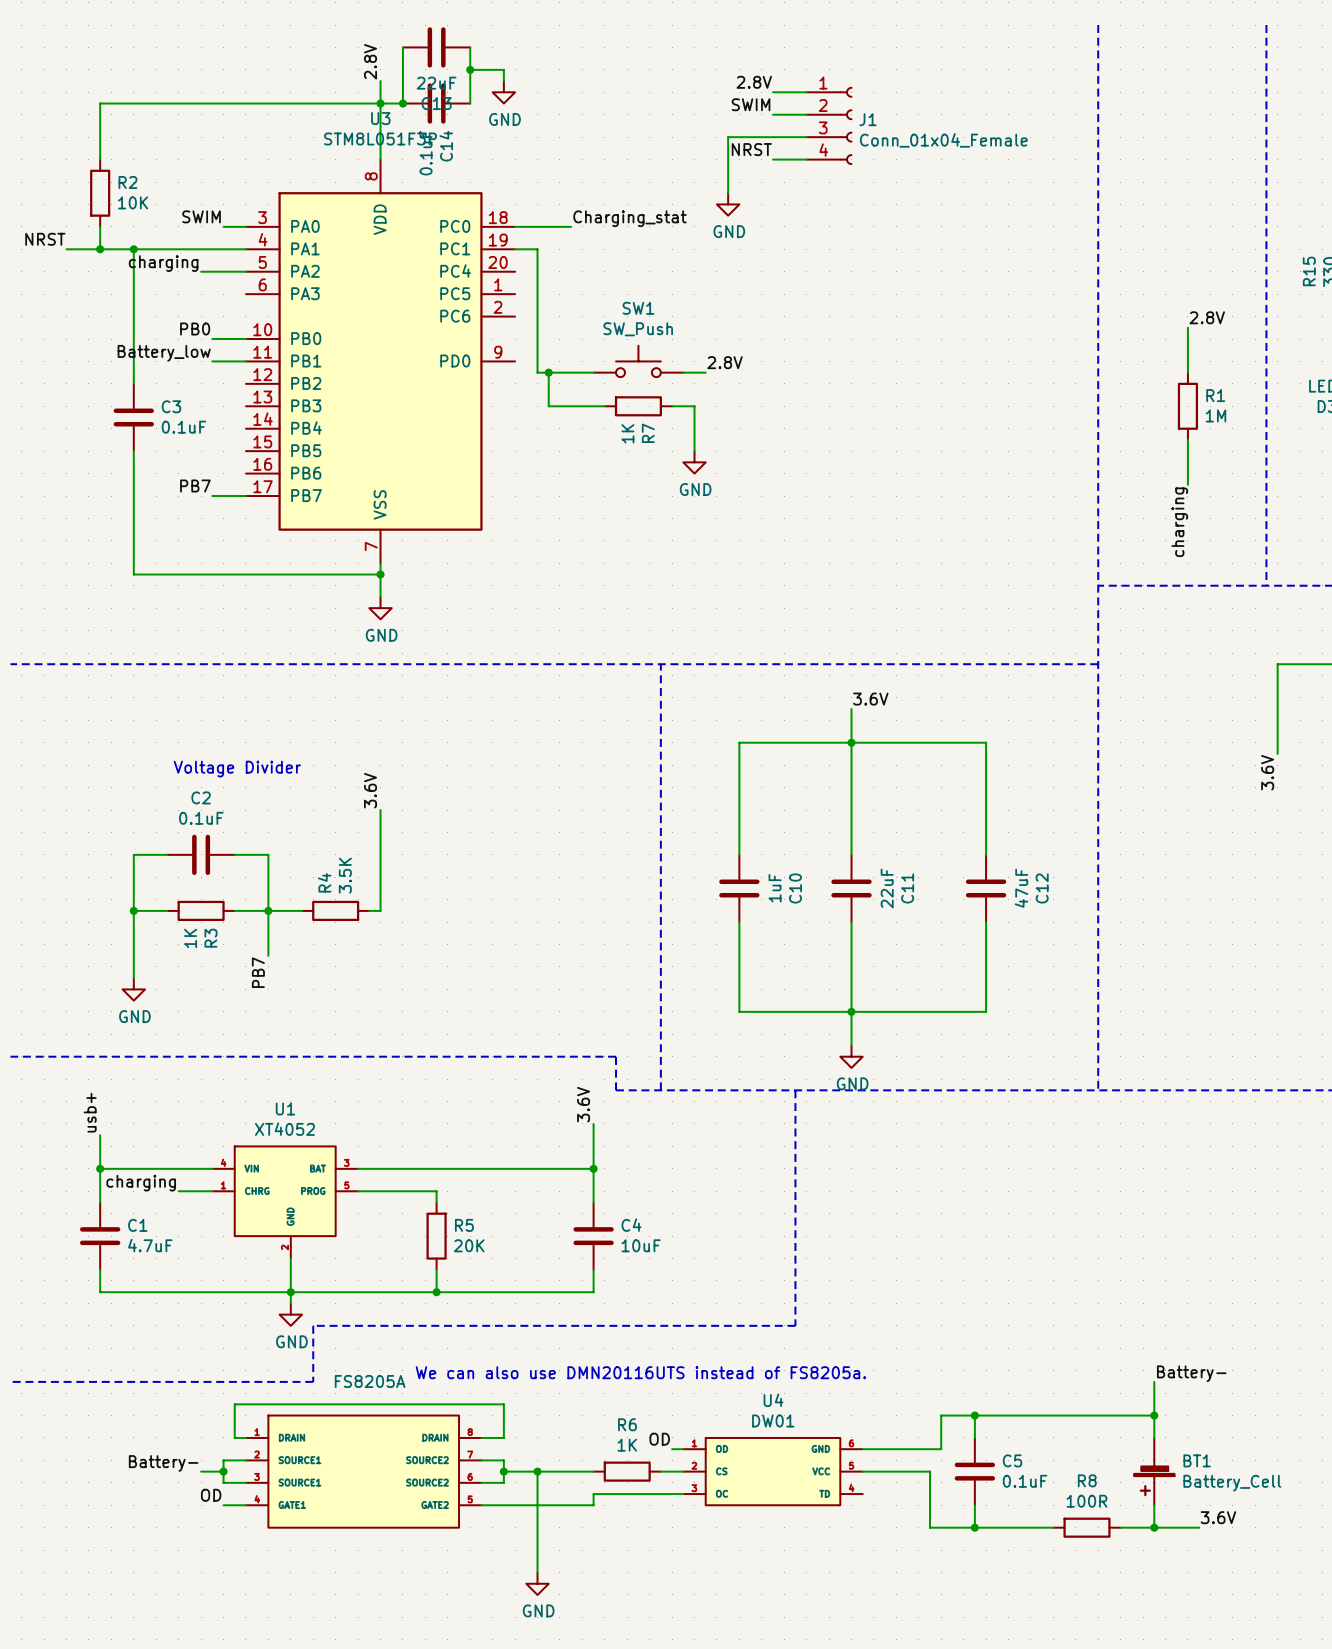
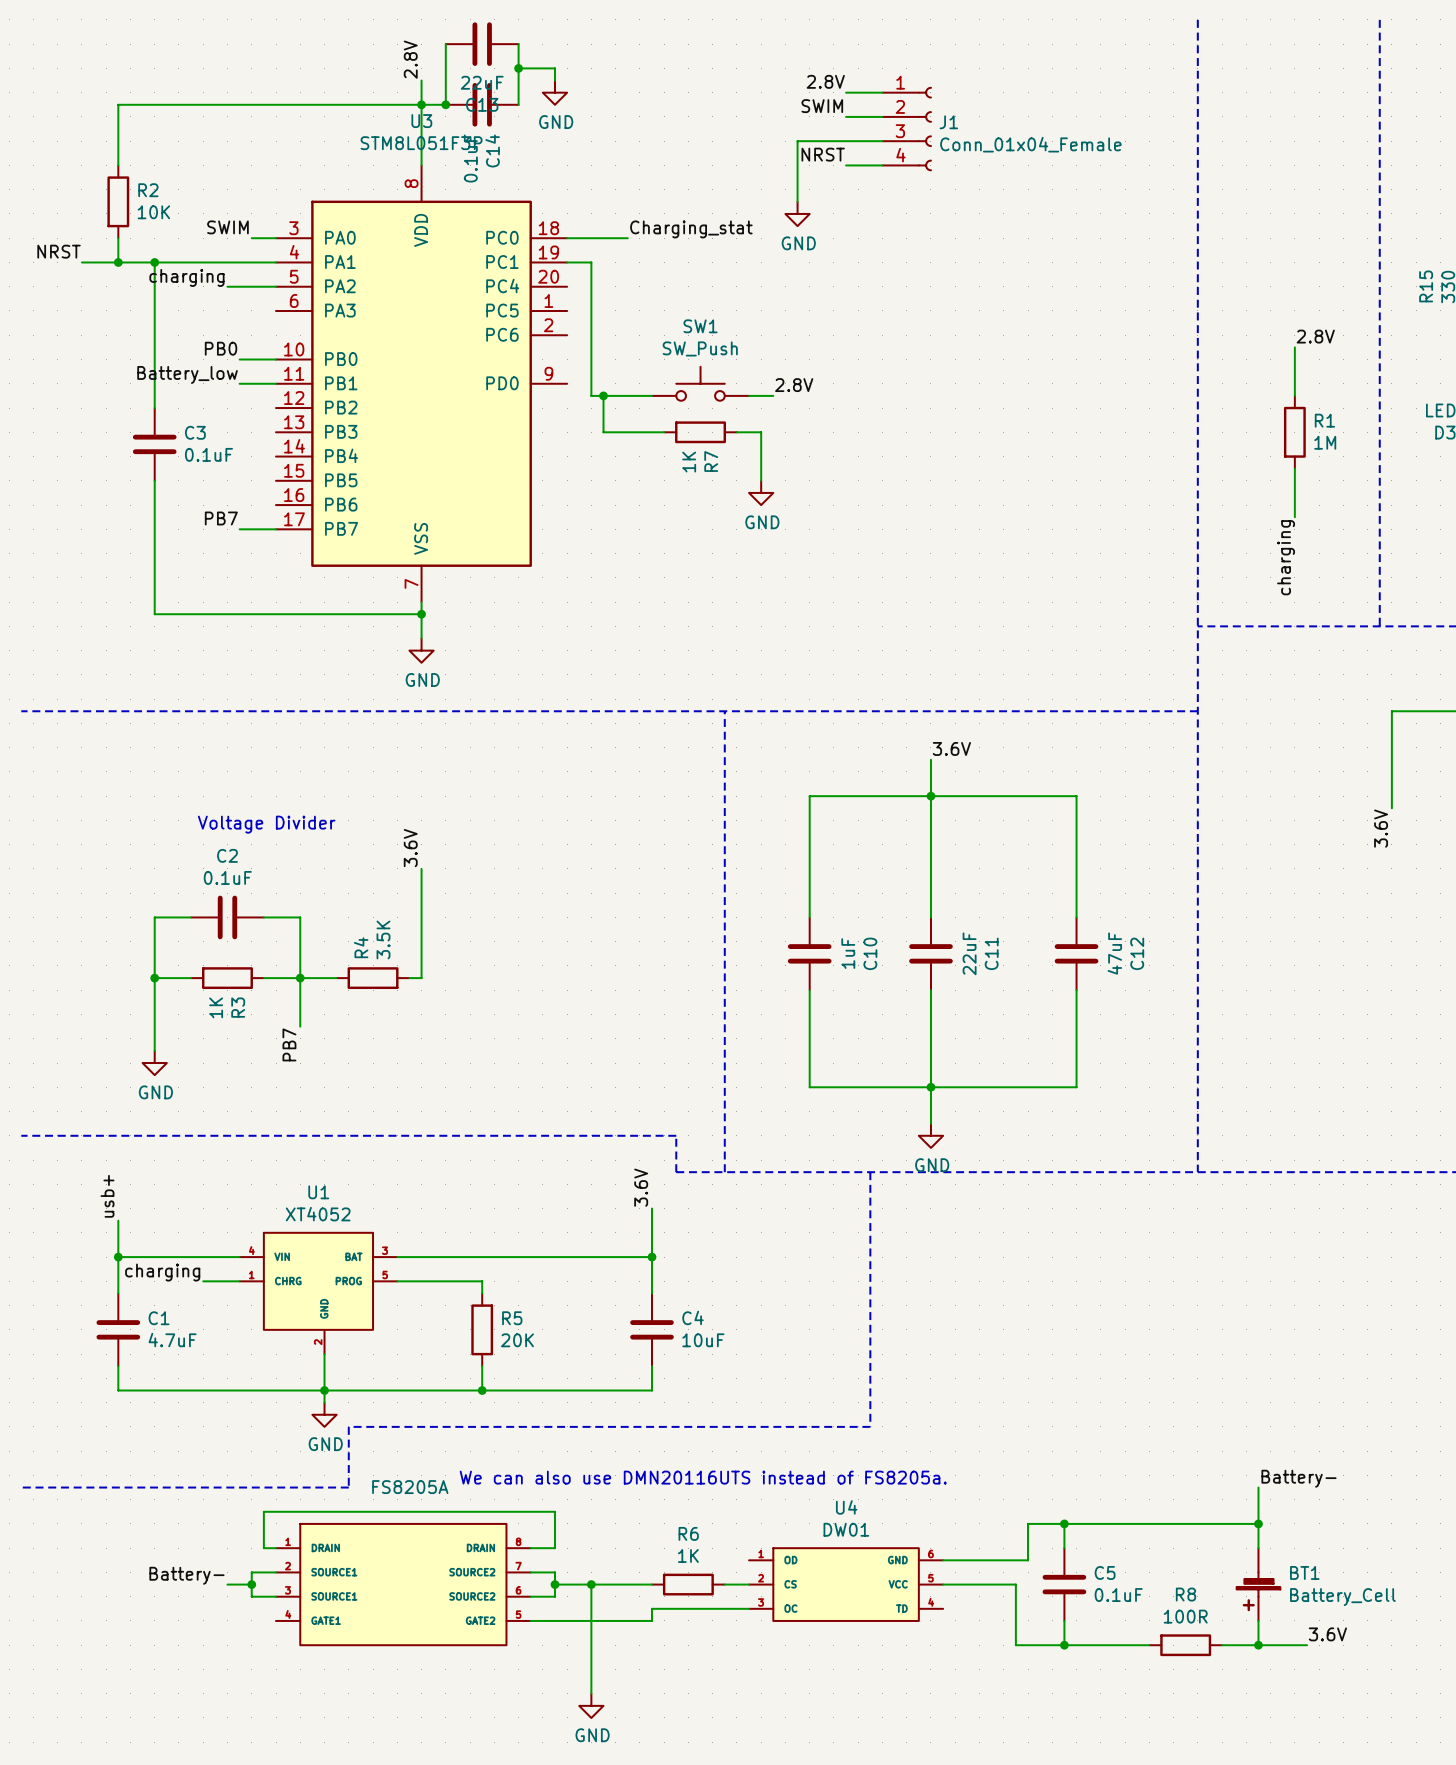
label: OD (659, 1439) -> none
wire: (672, 1449) (683, 1449) -> none
label: OD (211, 1495) -> none
wire: (223, 1505) (245, 1505) -> none

